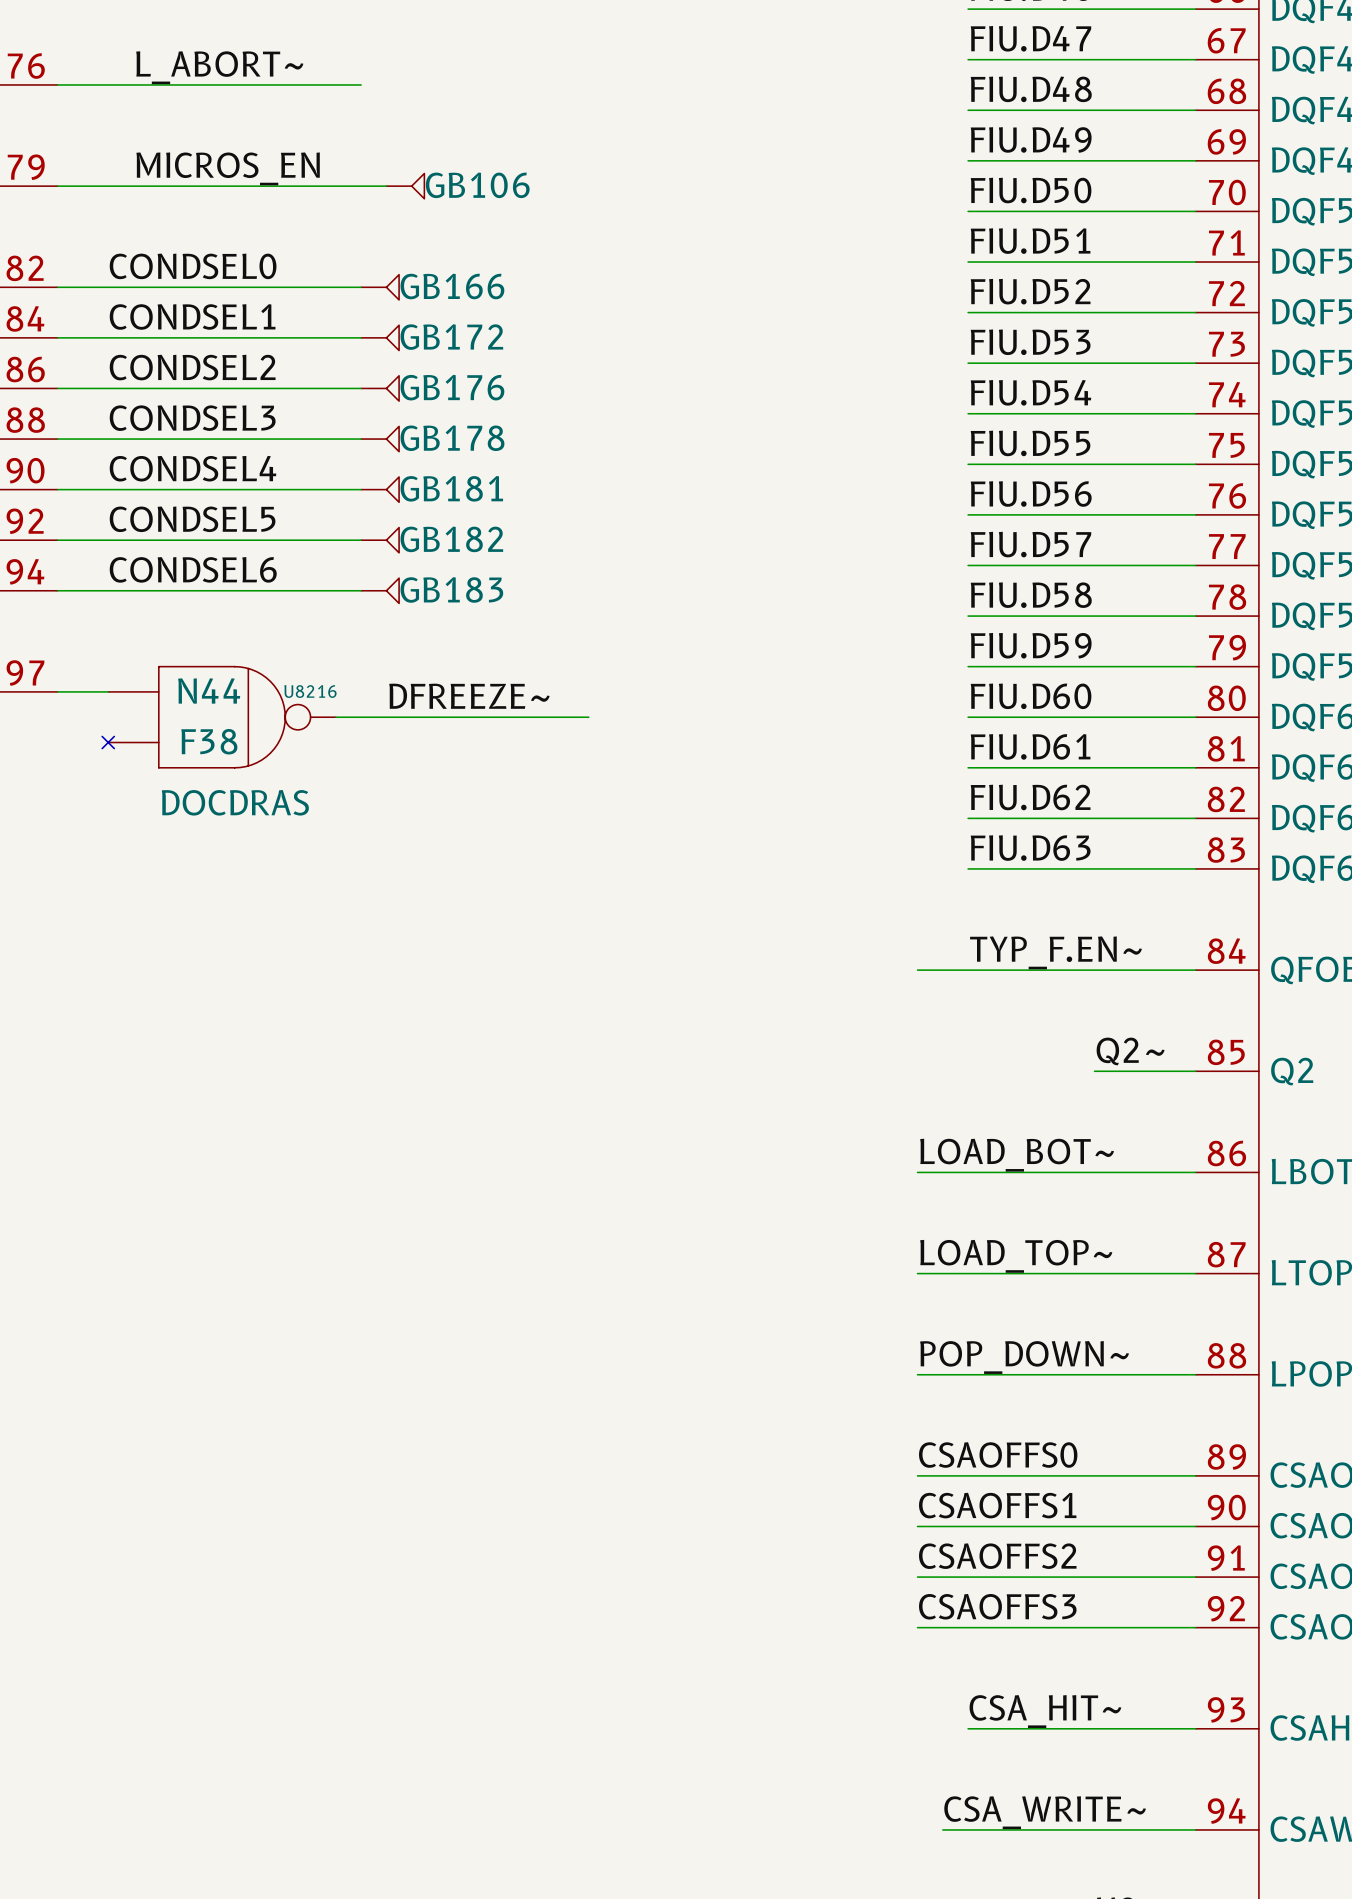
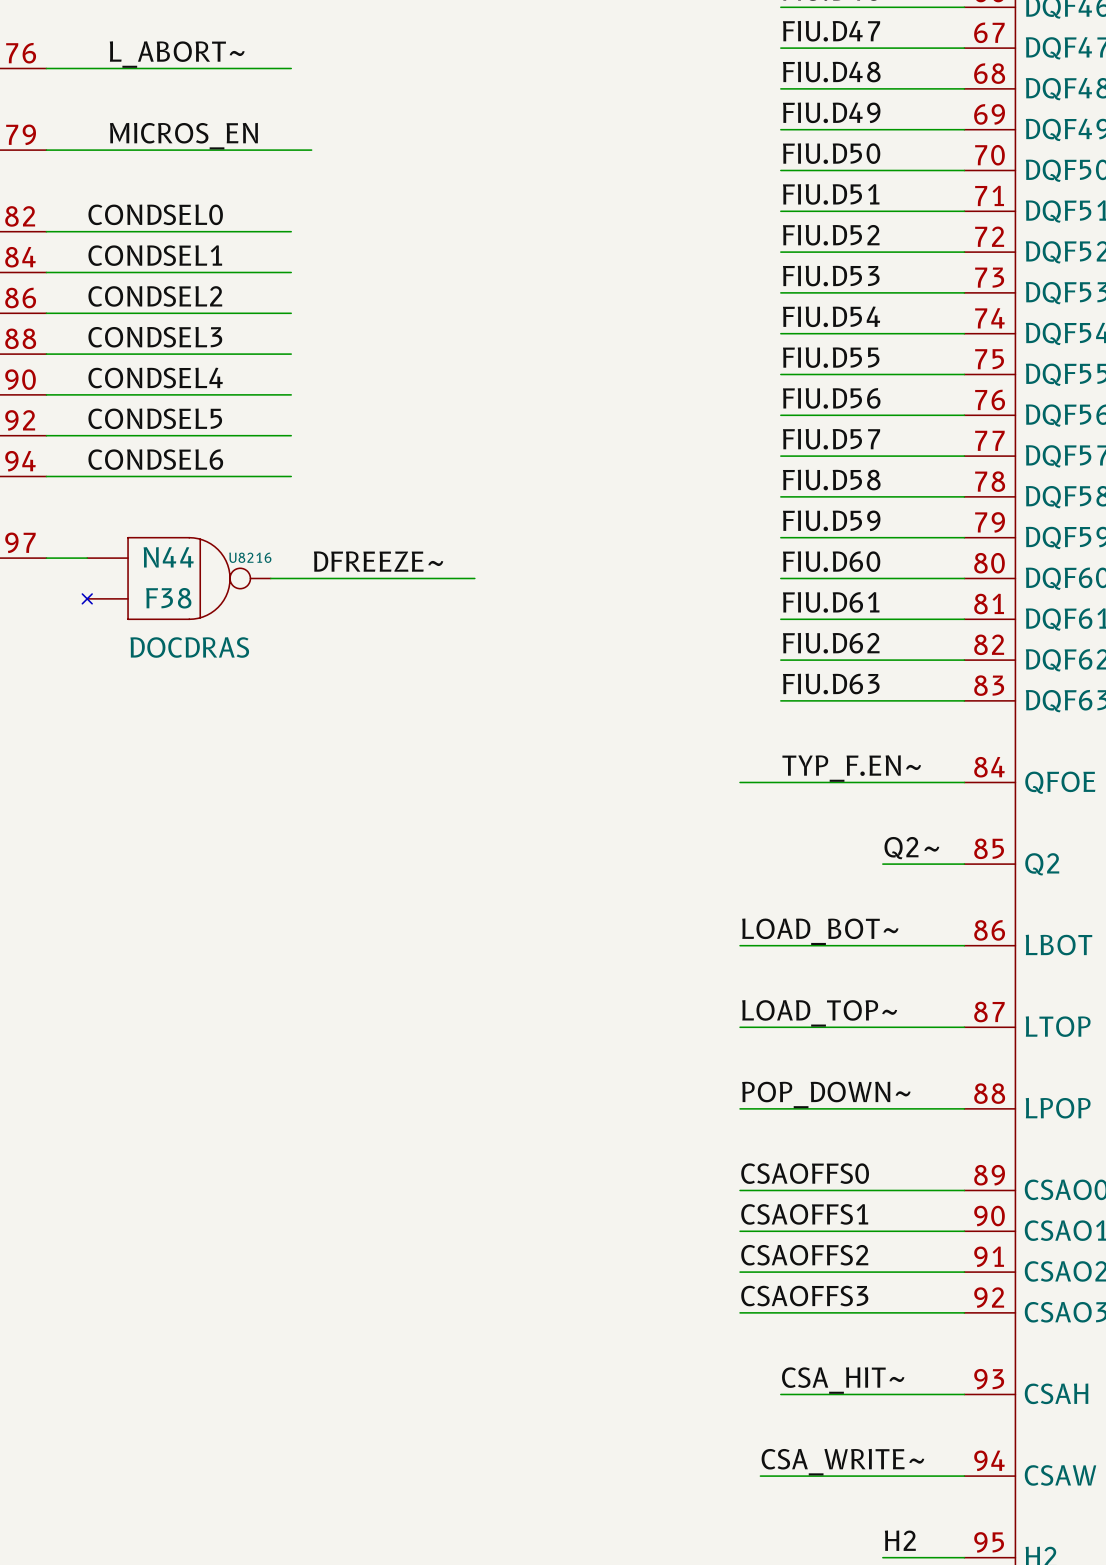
GB106: (405, 186) -> none
GB166: (380, 287) -> none
GB172: (380, 337) -> none
GB176: (380, 388) -> none
GB178: (380, 439) -> none
GB181: (380, 489) -> none
GB182: (380, 540) -> none
GB183: (380, 590) -> none

